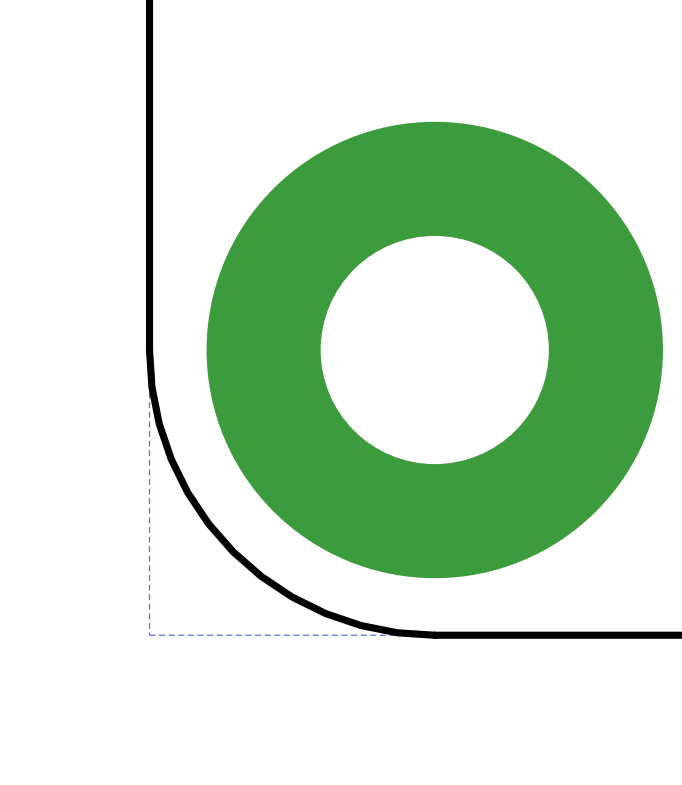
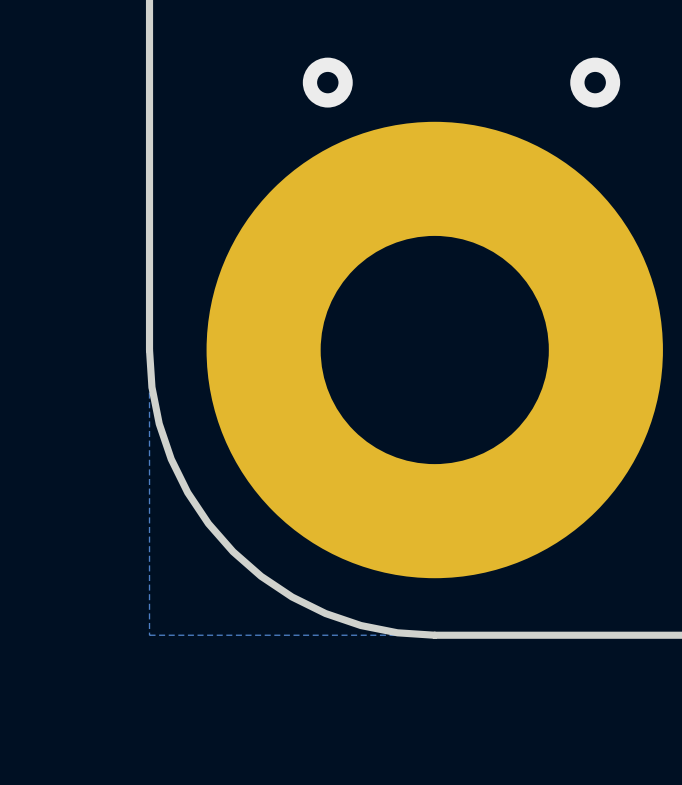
via: none -> (327, 82)
via: none -> (595, 82)

